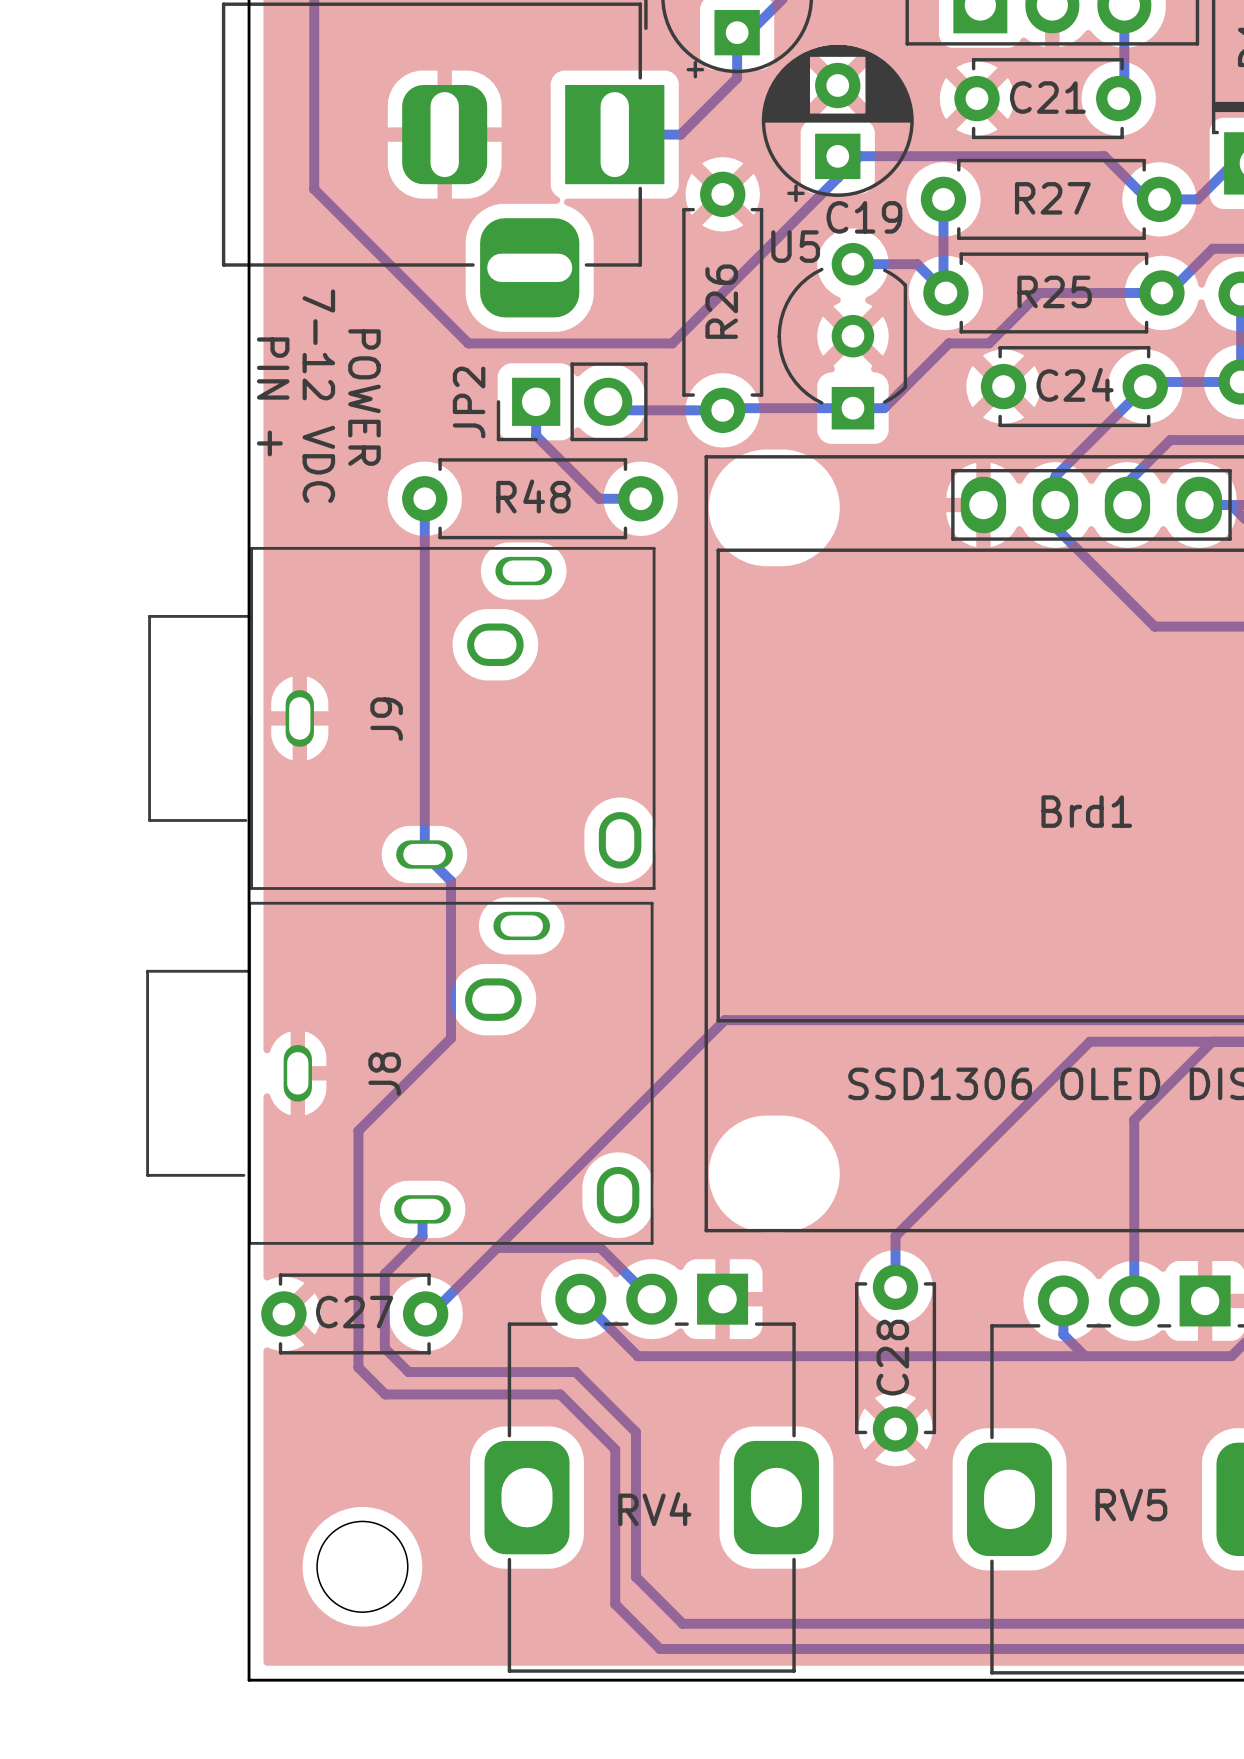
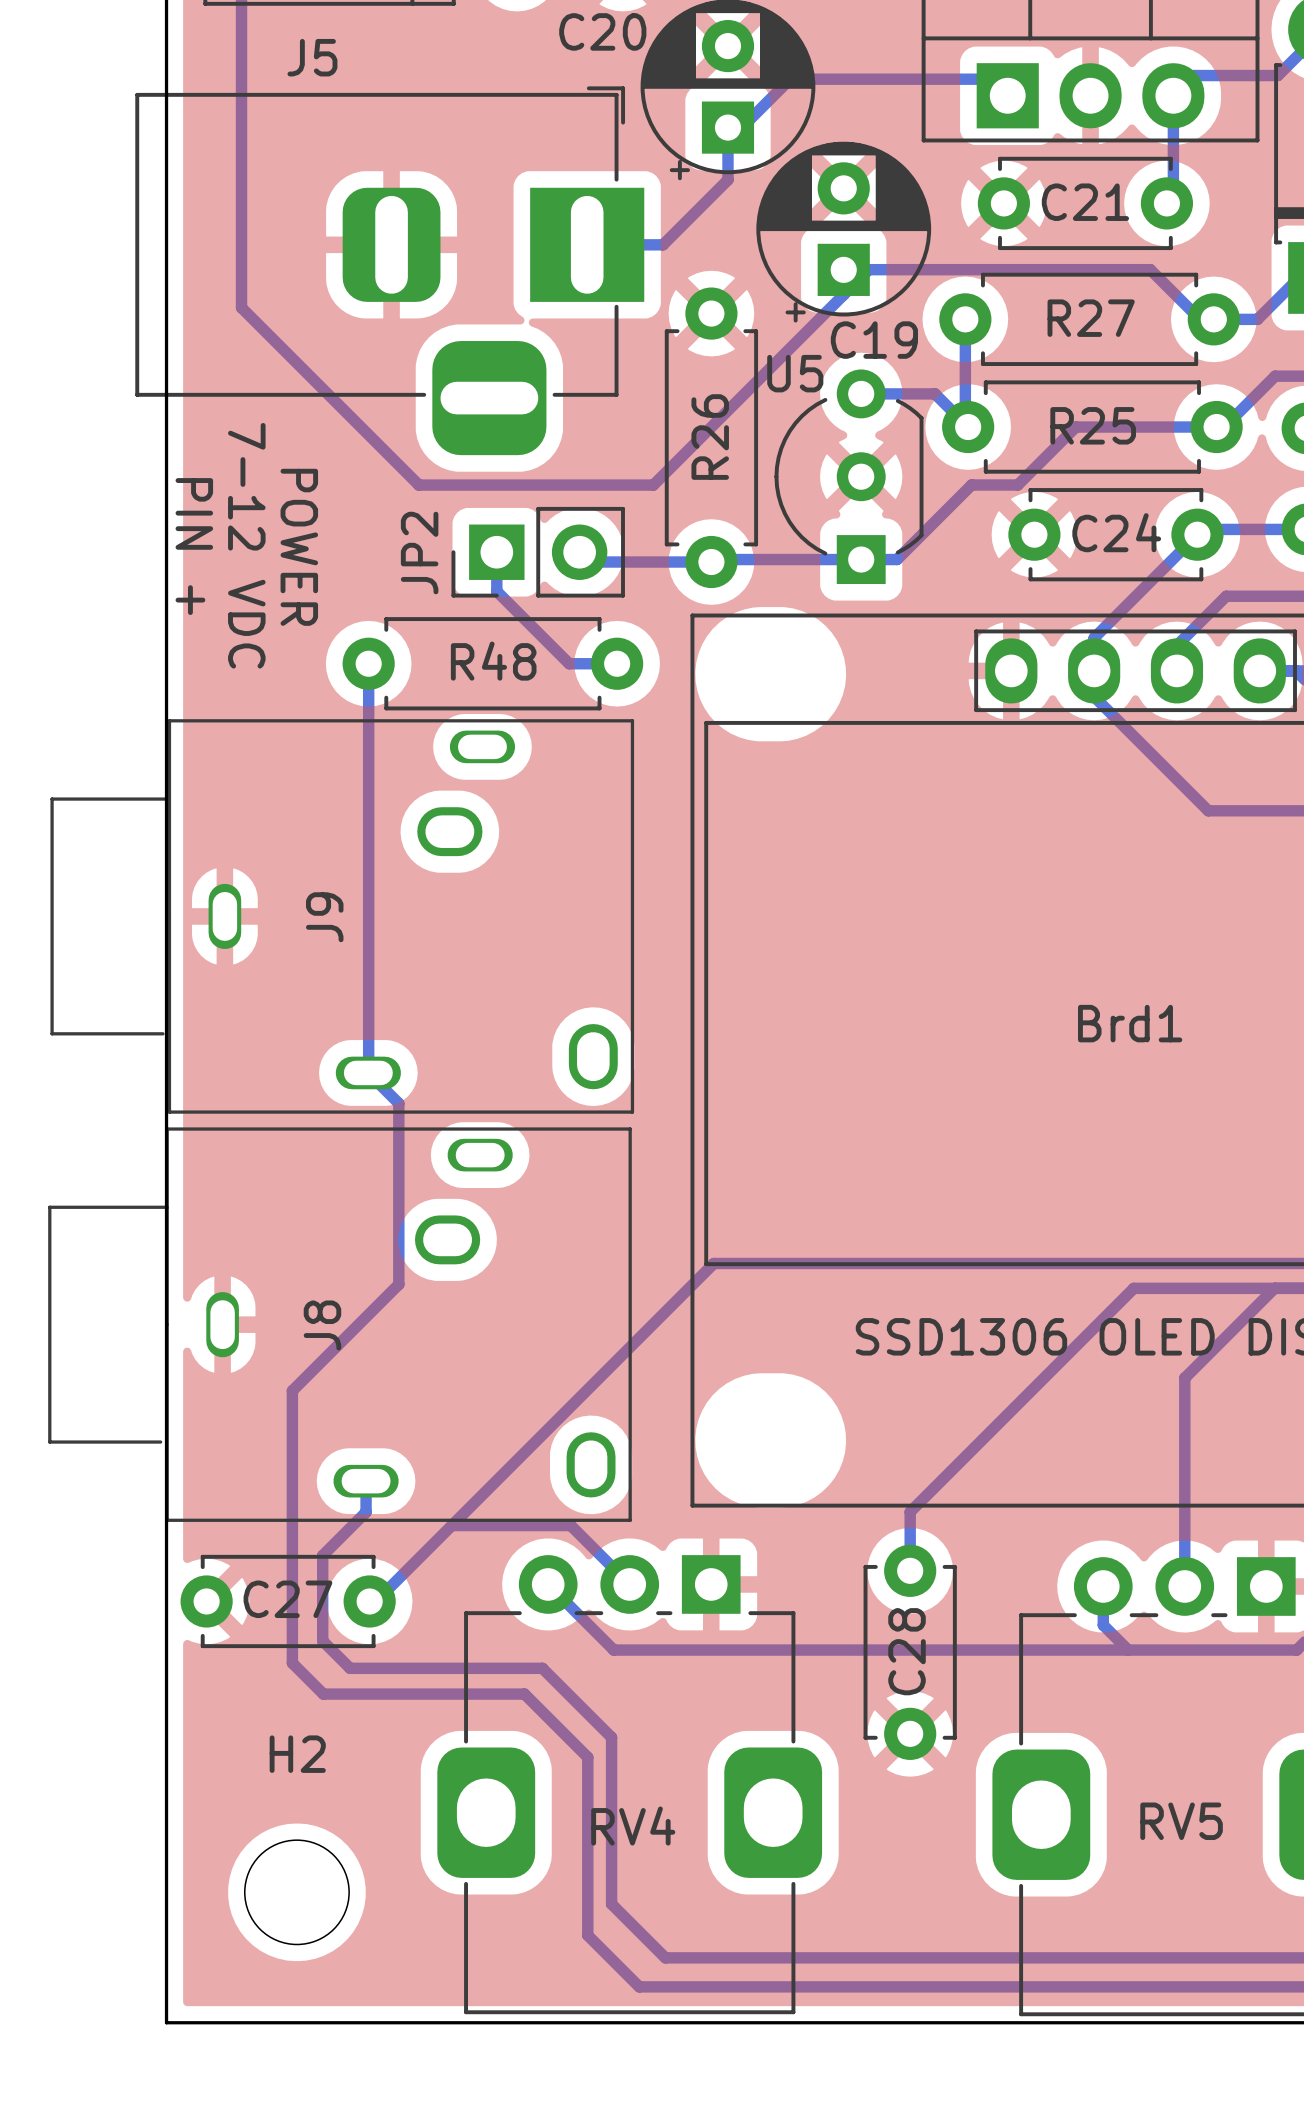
H2 name: none -> H2 (297, 1754)

